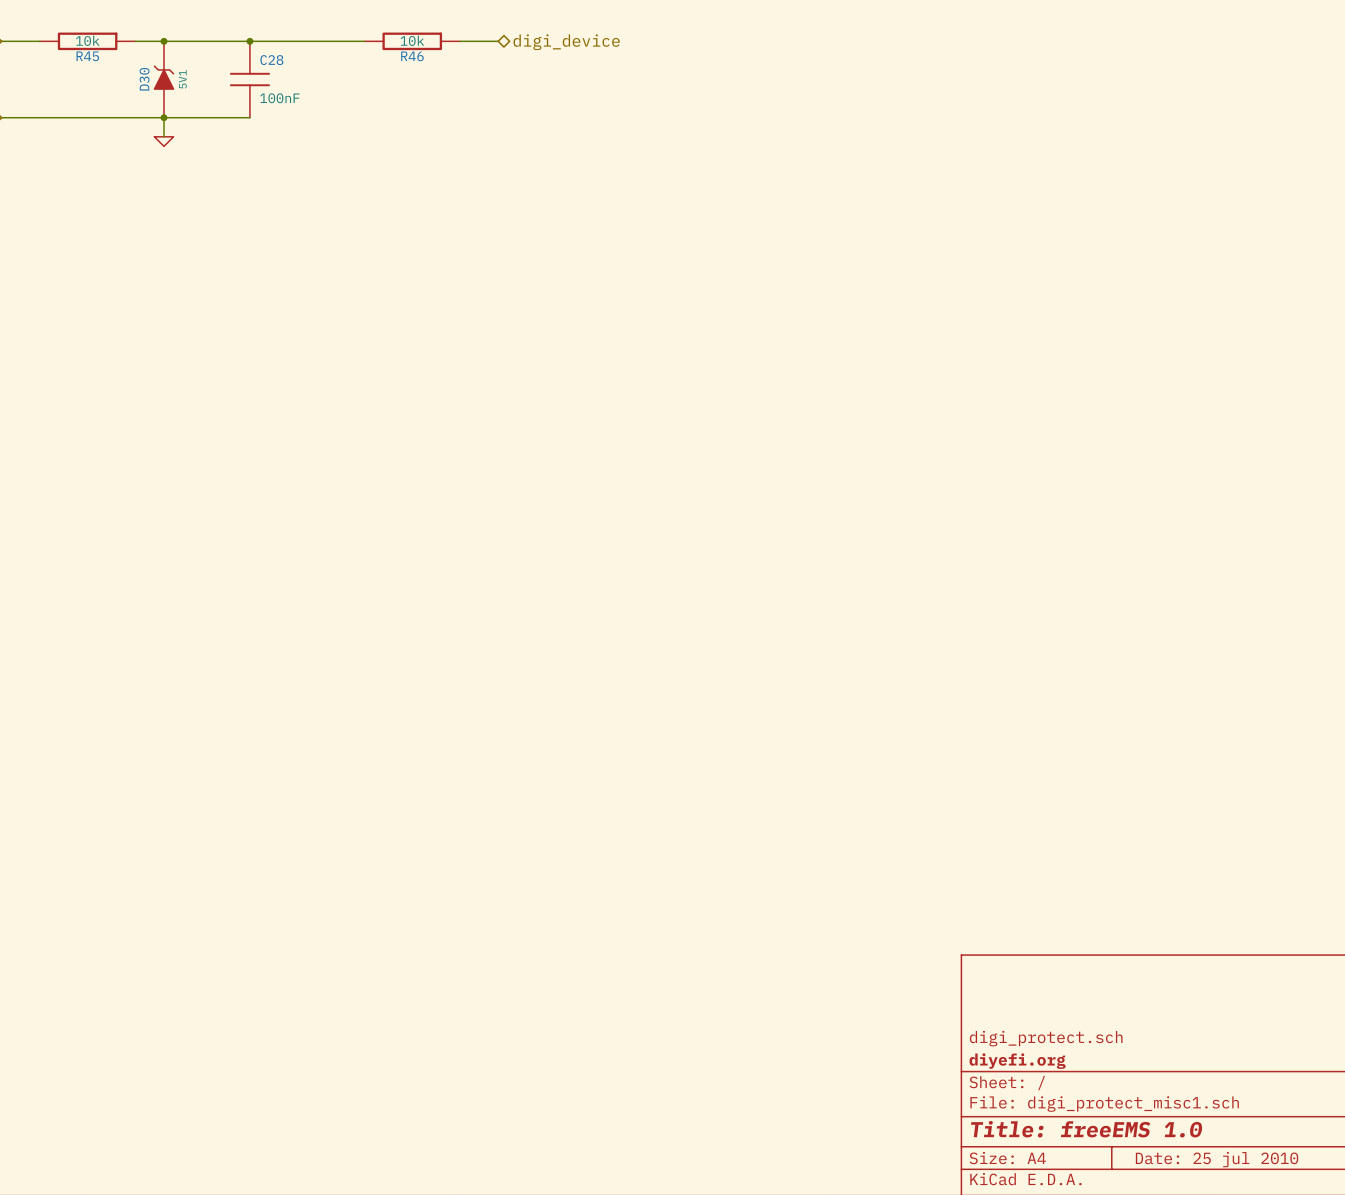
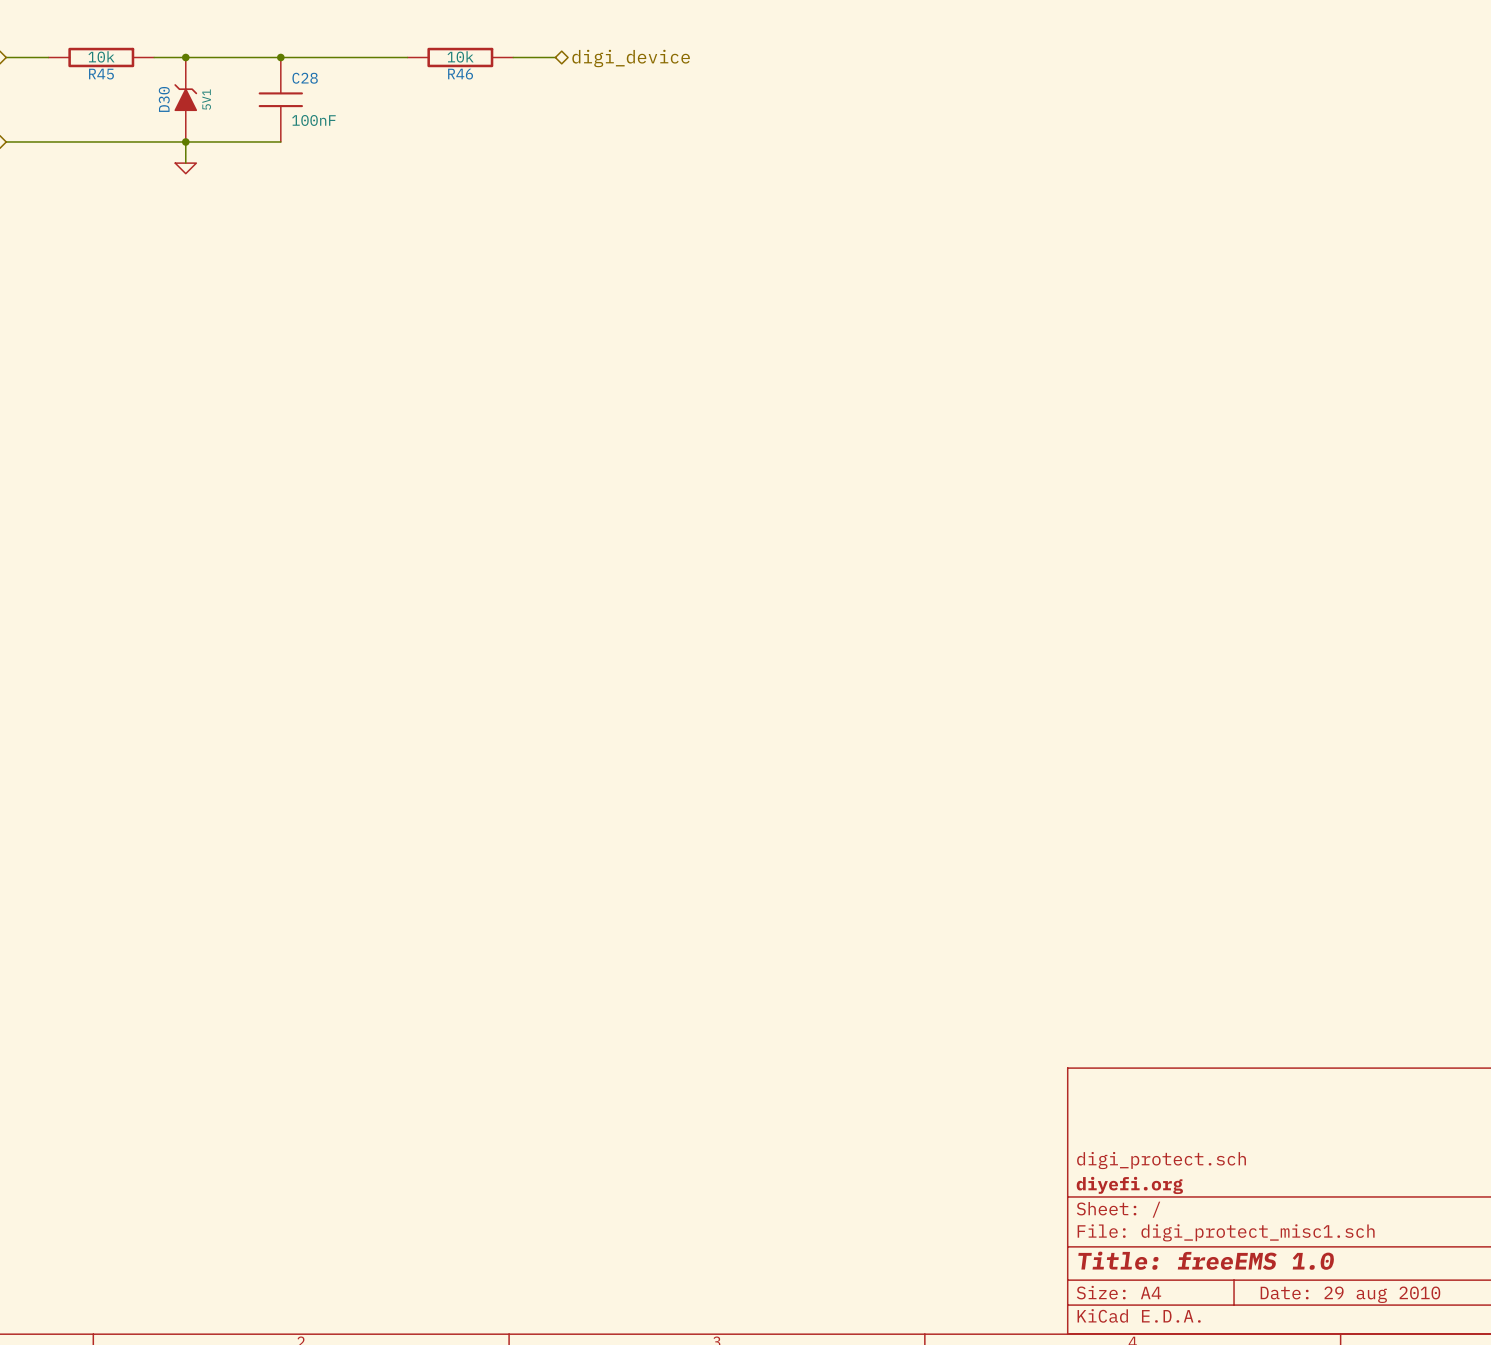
title block: Date: 25 jul 2010 (1217, 1159) -> Date: 29 aug 2010 (1350, 1294)

